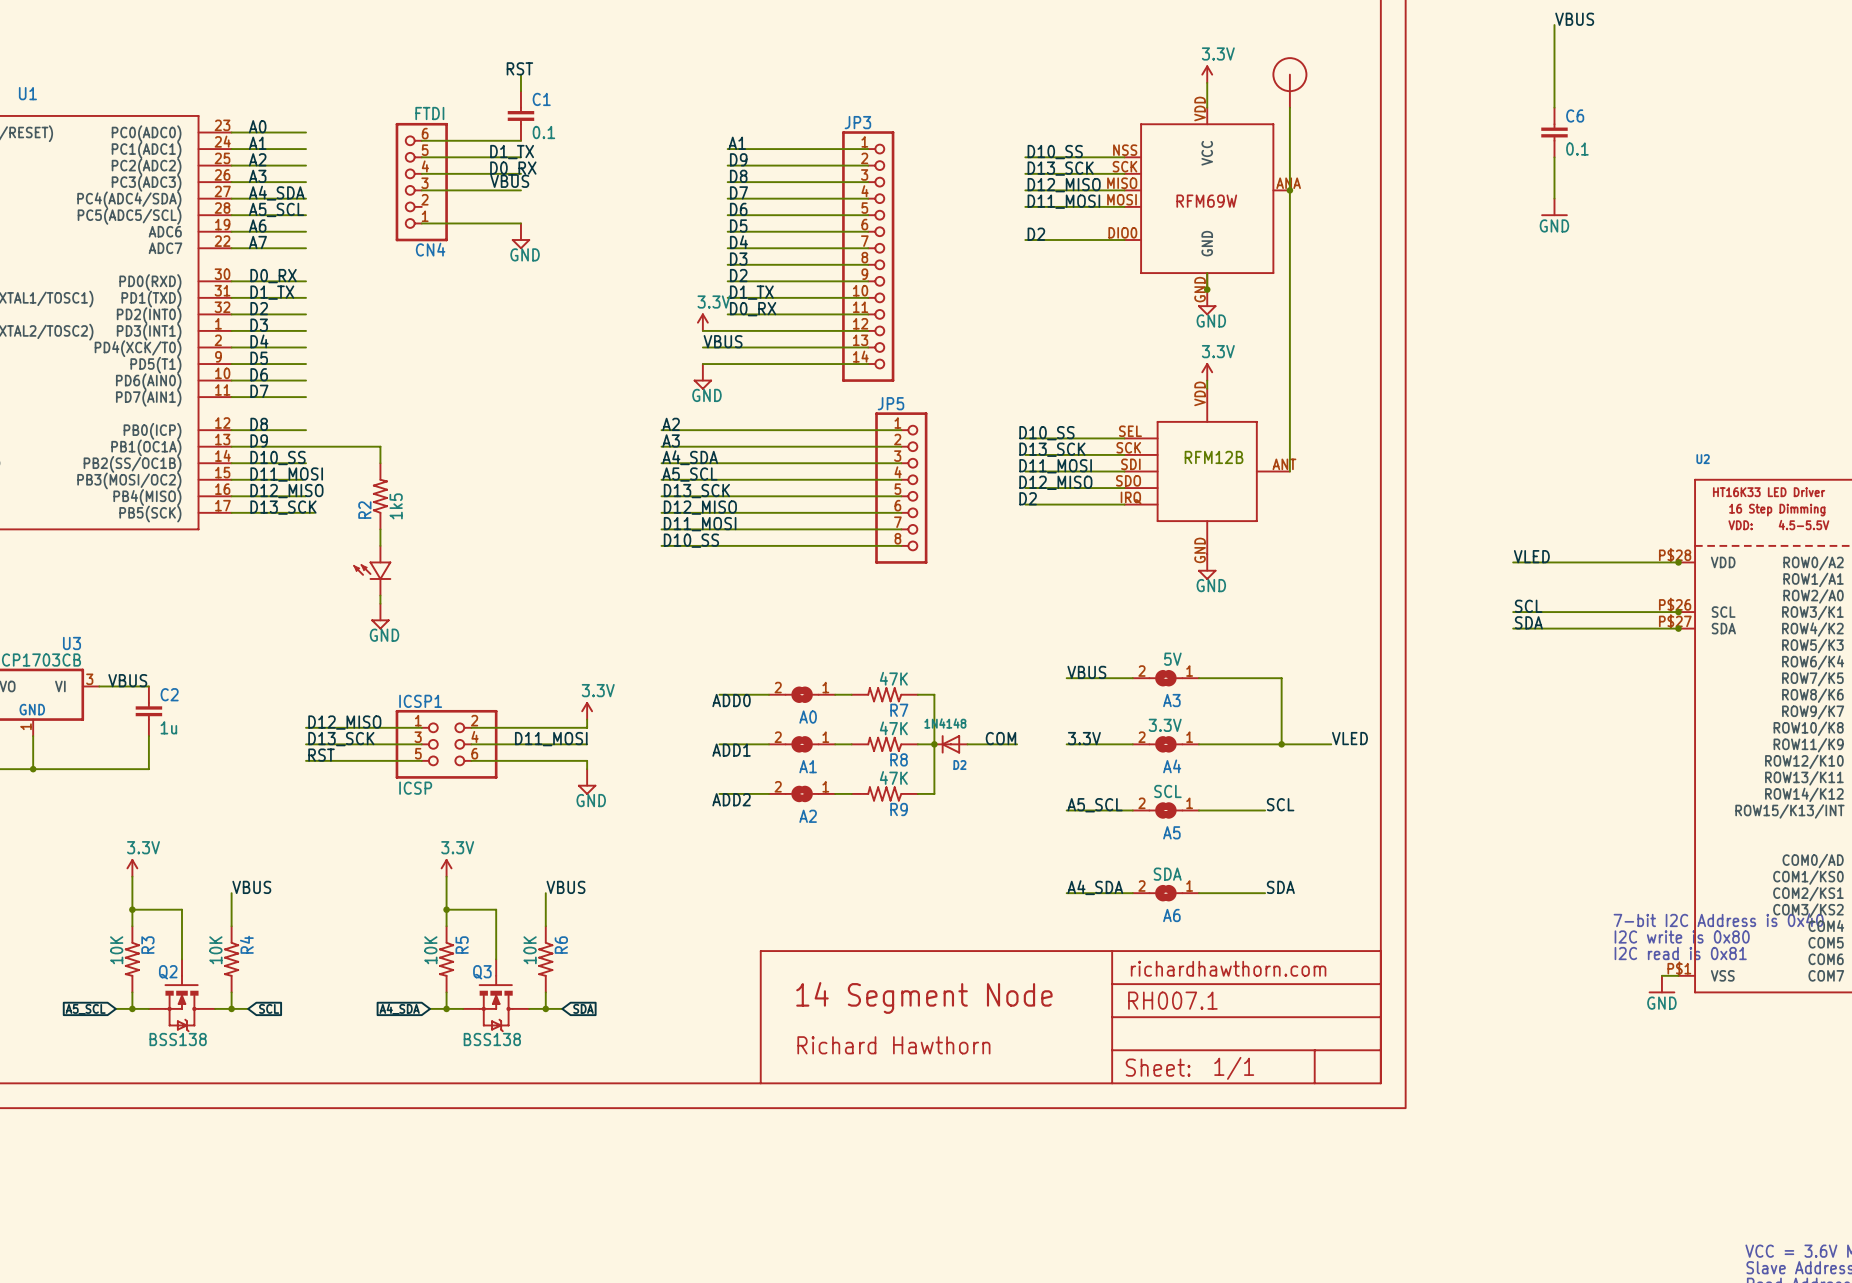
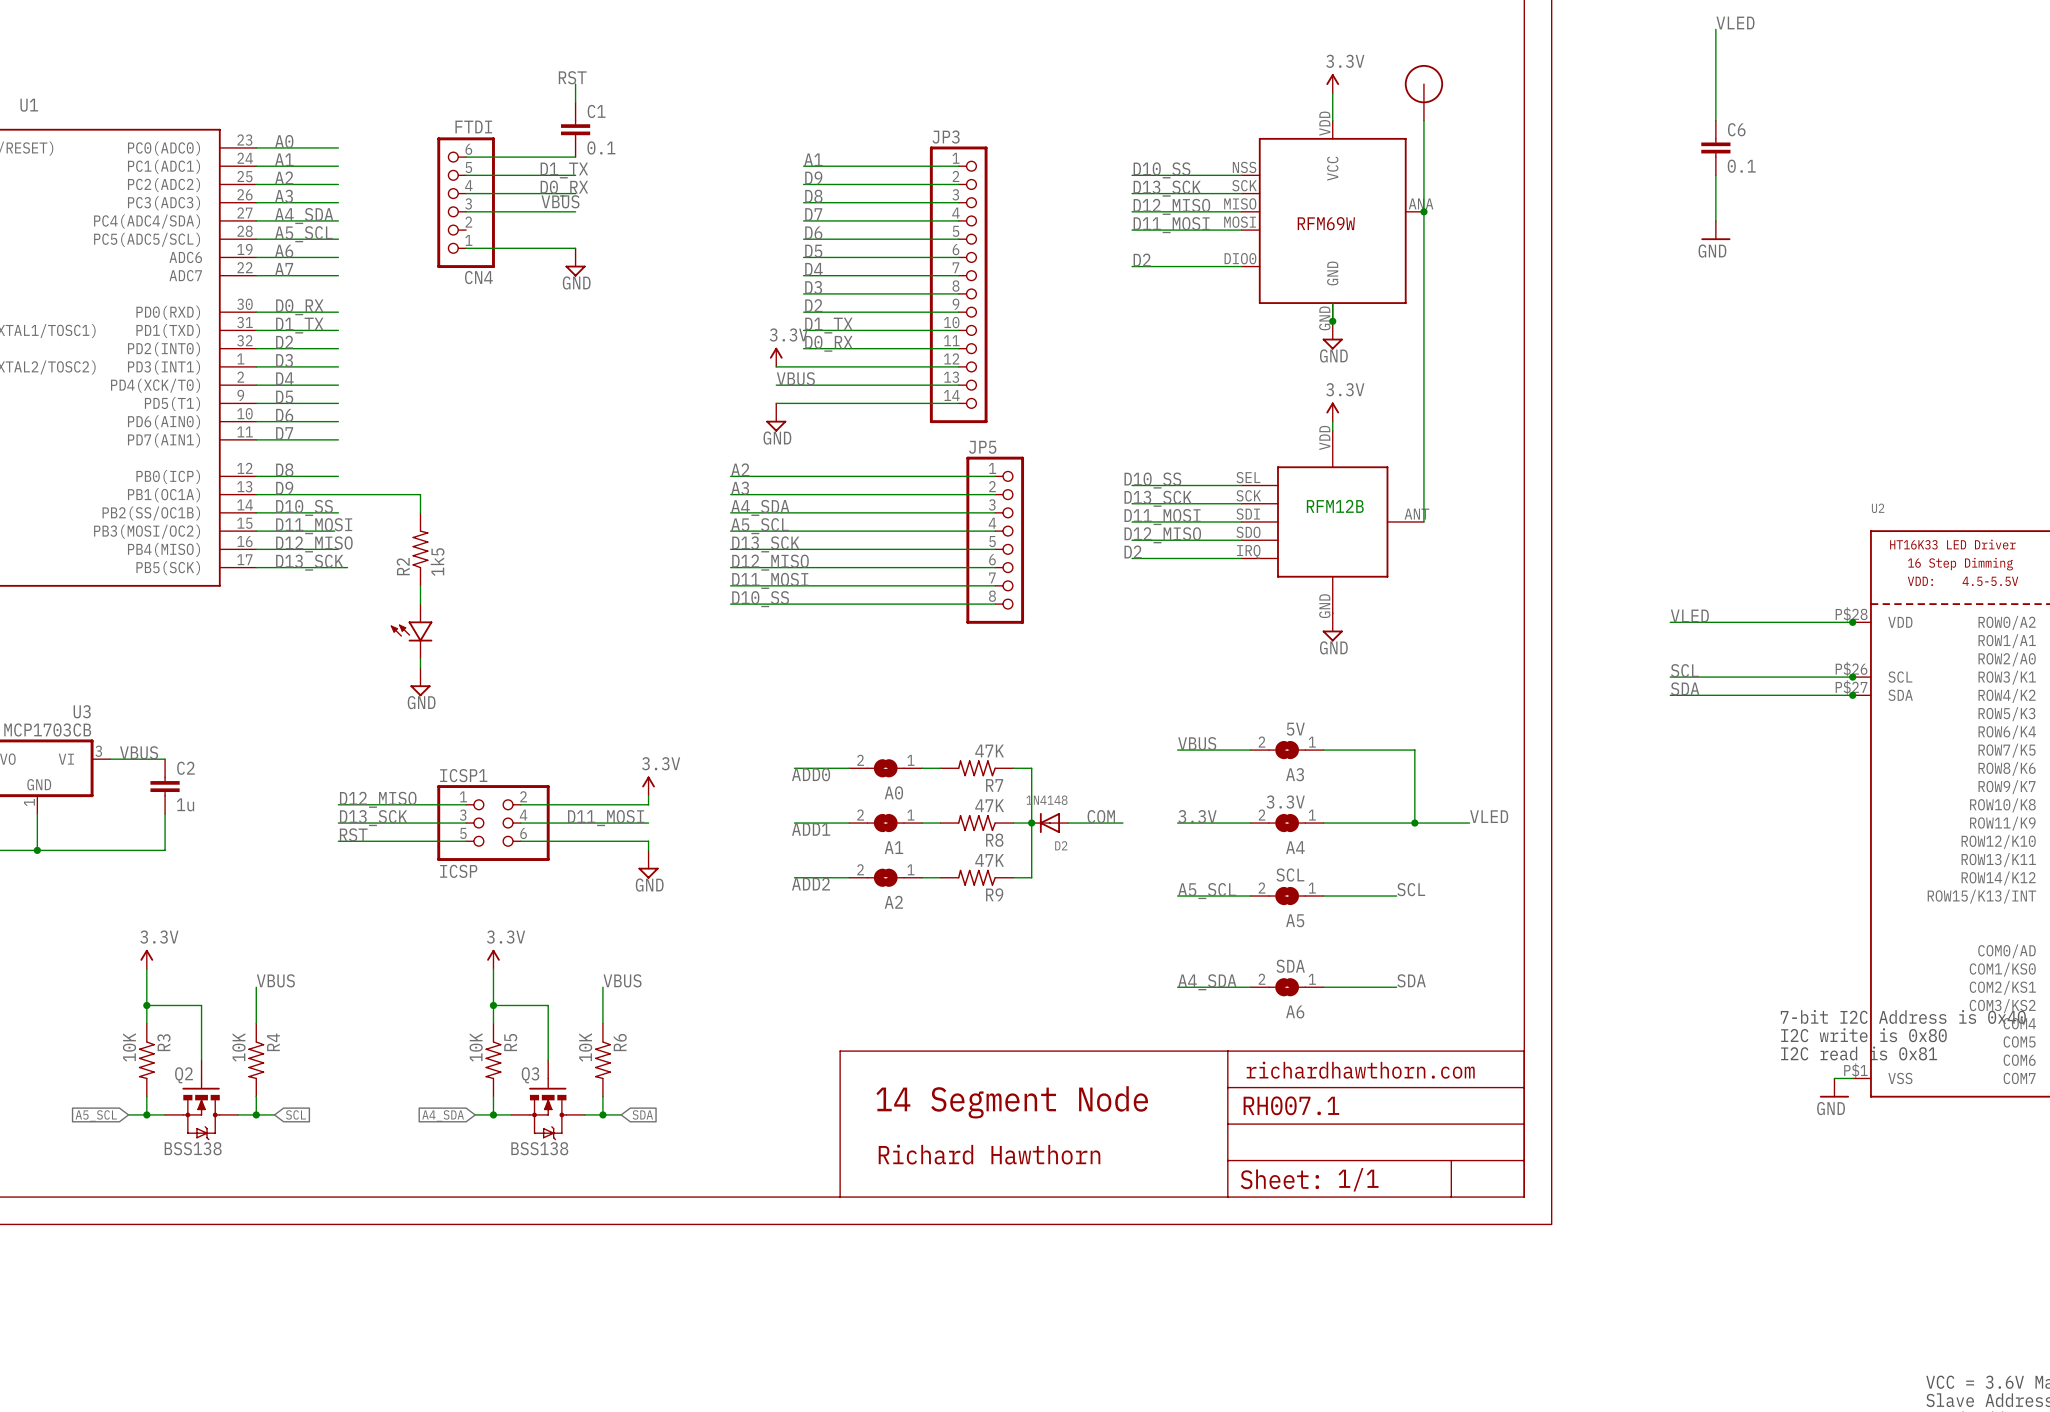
label: VBUS (1574, 19) -> VLED (1735, 22)

